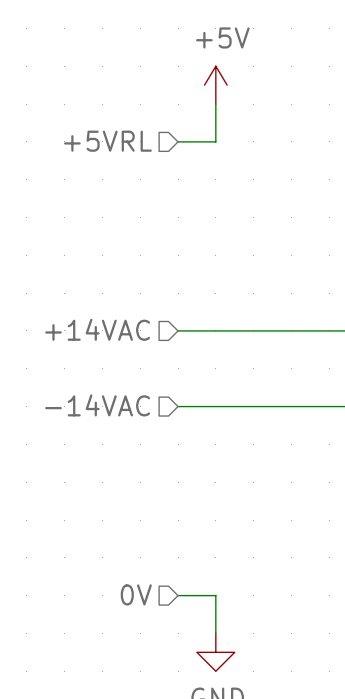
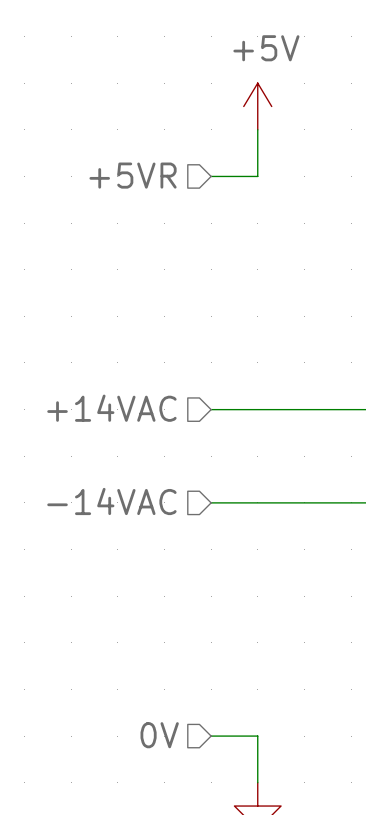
hierarchical label: +5VRL (107, 141) -> +5VR (133, 175)

